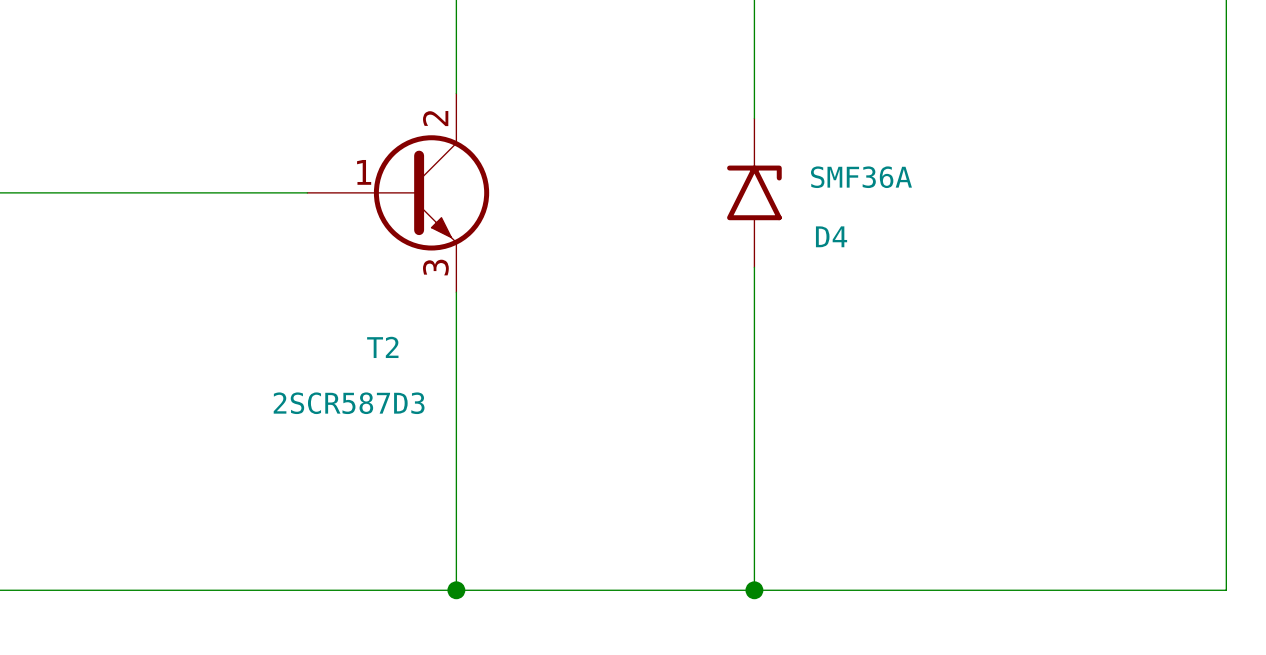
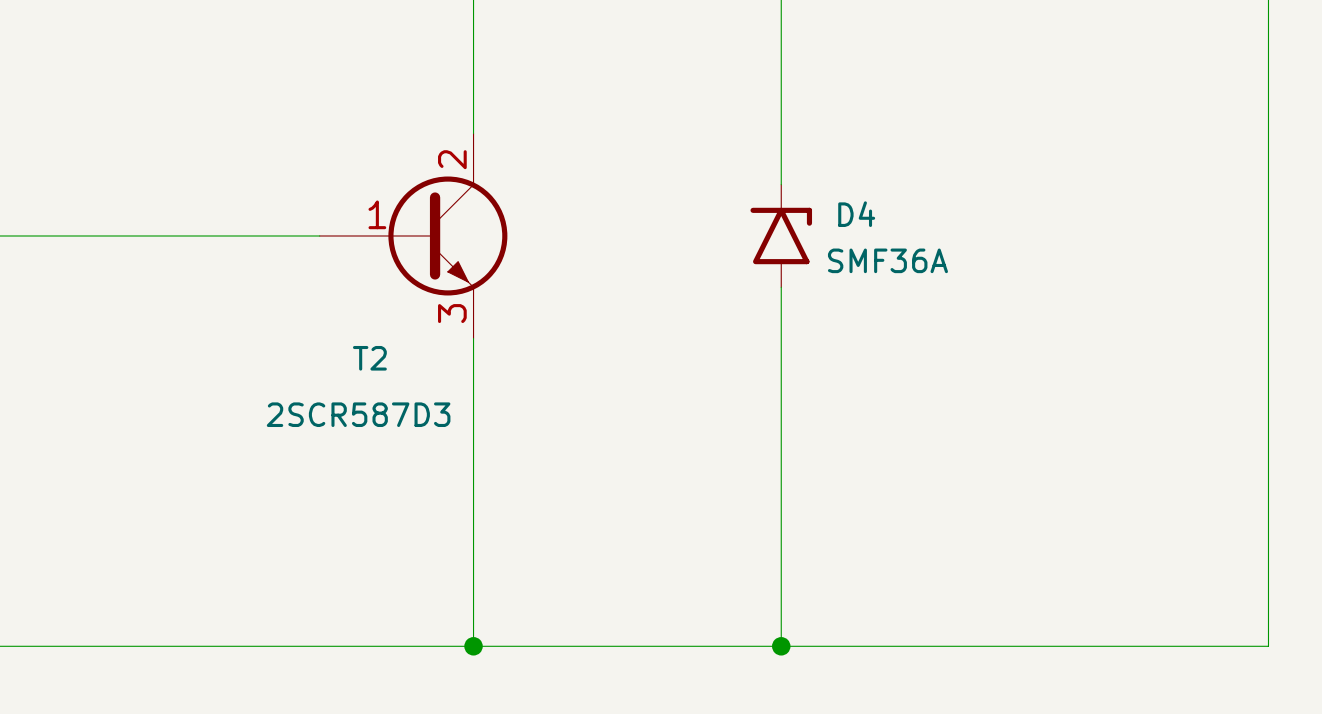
D4 symbol: [727, 118, 782, 268] -> [750, 184, 813, 288]
D4 value position: SMF36A (861, 177) -> SMF36A (887, 260)
D4 name position: D4 (831, 236) -> D4 (856, 214)
T2 name position: T2 (382, 347) -> T2 (369, 358)
T2 value position: 2SCR587D3 (349, 403) -> 2SCR587D3 (358, 414)

